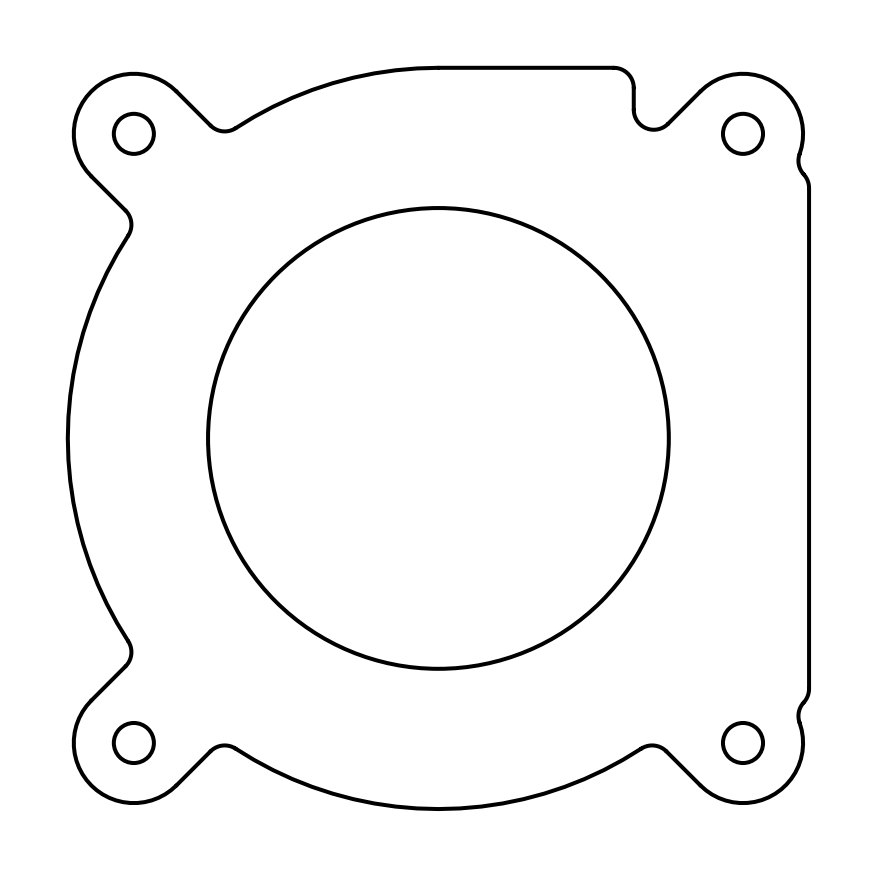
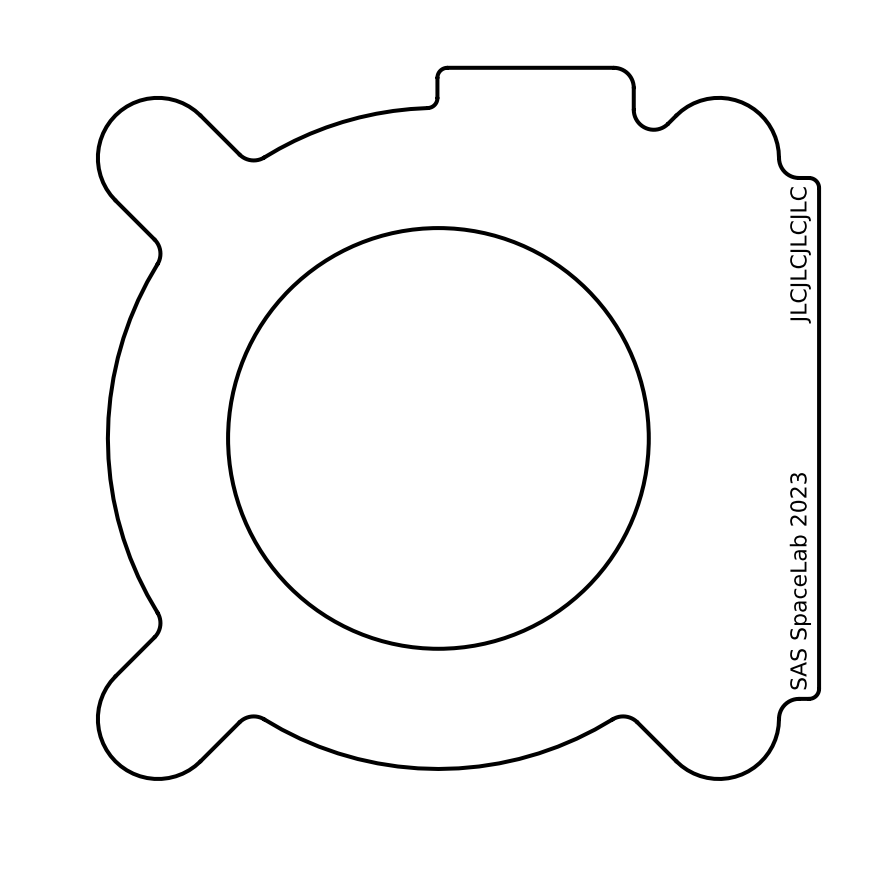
board edge: (447, 67) (395, 70) (353, 77) (292, 97) (231, 130) (220, 130) (210, 125) -> (447, 67) (441, 69) (438, 73) (437, 100) (431, 107) (376, 113) (342, 122) (310, 133) (258, 159) (249, 159) (241, 156) (210, 125)
round board edge: [111, 111, 156, 156] -> none
round board edge: [720, 111, 766, 156] -> none
board edge: (200, 115) (170, 86) (158, 79) (144, 74) (130, 73) (115, 76) (102, 82) (91, 91) (82, 102) (76, 115) (73, 130) (74, 144) (79, 158) (86, 170) (115, 200) -> (200, 115) (182, 103) (161, 97) (140, 100) (126, 106) (115, 115) (106, 126) (100, 140) (97, 161) (103, 182) (115, 200)
board edge: (676, 115) (712, 82) (732, 74) (747, 73) (761, 76) (781, 87) (795, 104) (800, 117) (802, 139) (798, 162) (807, 180) (809, 188) (809, 688) (807, 696) (798, 714) (803, 744) (798, 766) (786, 784) (768, 797) (754, 801) (740, 803) (718, 797) (706, 790) (676, 761) -> (676, 115) (693, 103) (714, 98) (728, 98) (748, 105) (764, 118) (772, 130) (777, 143) (779, 163) (783, 170) (793, 177) (814, 179) (819, 188) (818, 691) (812, 698) (793, 699) (784, 704) (779, 713) (777, 732) (772, 746) (759, 763) (748, 771) (728, 778) (714, 778) (693, 773) (676, 761)
round board edge size: [206, 206, 671, 671] -> [226, 226, 651, 651]
board edge: (125, 210) (130, 220) (130, 231) (97, 292) (77, 353) (70, 395) (67, 438) (70, 481) (77, 523) (97, 584) (130, 645) (130, 656) (125, 666) -> (125, 210) (156, 241) (160, 253) (158, 262) (138, 300) (123, 338) (113, 377) (108, 418) (110, 479) (117, 519) (130, 557) (160, 620) (156, 635) (125, 666)
text: none -> JLCJLCJLCJLC (800, 255)
text: none -> SAS SpaceLab 2023 (800, 581)
board edge: (115, 676) (86, 705) (79, 718) (74, 732) (73, 746) (76, 760) (82, 774) (91, 785) (102, 794) (115, 800) (130, 802) (144, 802) (158, 797) (170, 790) (200, 761) -> (115, 676) (103, 694) (97, 715) (100, 736) (106, 750) (115, 761) (126, 770) (140, 776) (161, 778) (182, 773) (200, 761)
round board edge: [111, 720, 156, 766] -> none
round board edge: [720, 720, 766, 766] -> none
board edge: (666, 751) (656, 745) (645, 746) (584, 779) (523, 799) (481, 806) (438, 809) (395, 806) (353, 799) (292, 779) (231, 746) (220, 745) (210, 751) -> (666, 751) (635, 720) (623, 716) (614, 718) (576, 738) (538, 753) (499, 763) (458, 768) (418, 768) (357, 758) (318, 746) (255, 716) (241, 720) (210, 751)

